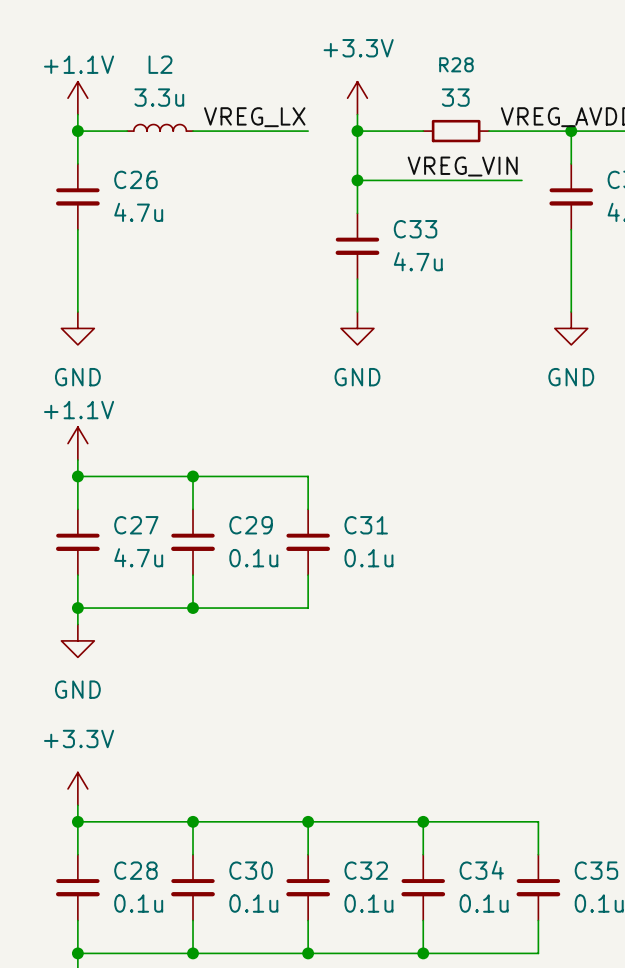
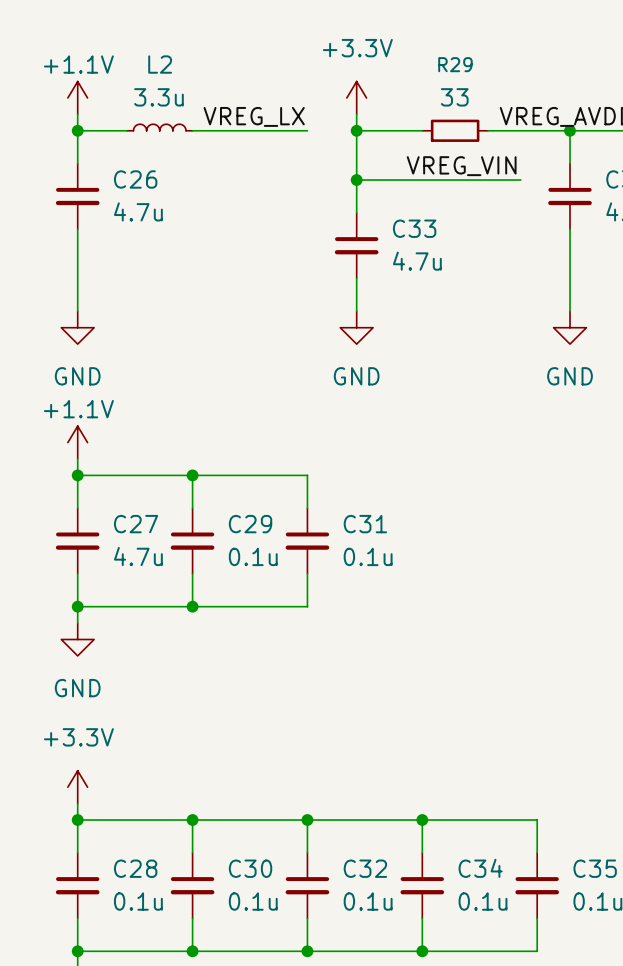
R28 name: R28 (456, 64) -> R29 (455, 64)

